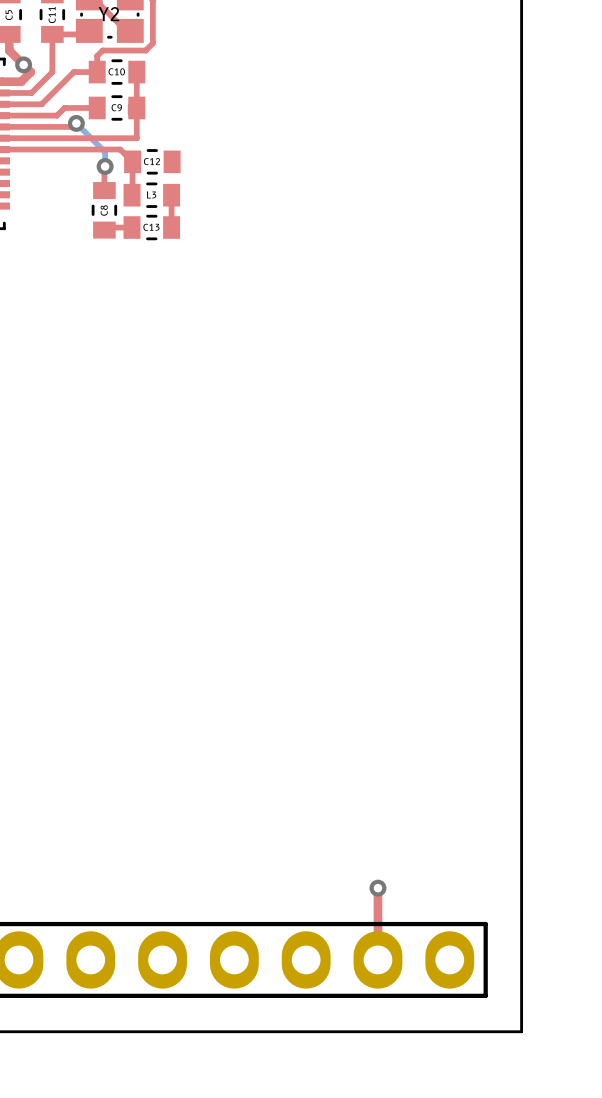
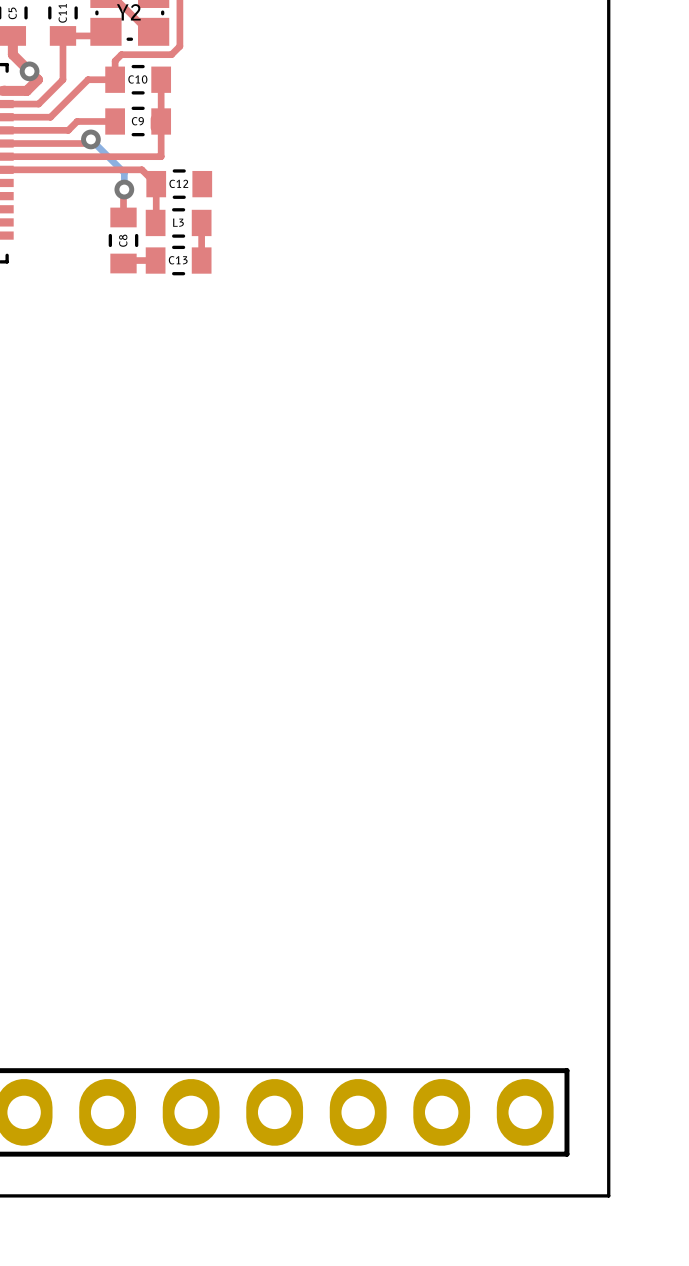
top track: (377, 888) (377, 959) -> none
via: (377, 888) -> none

